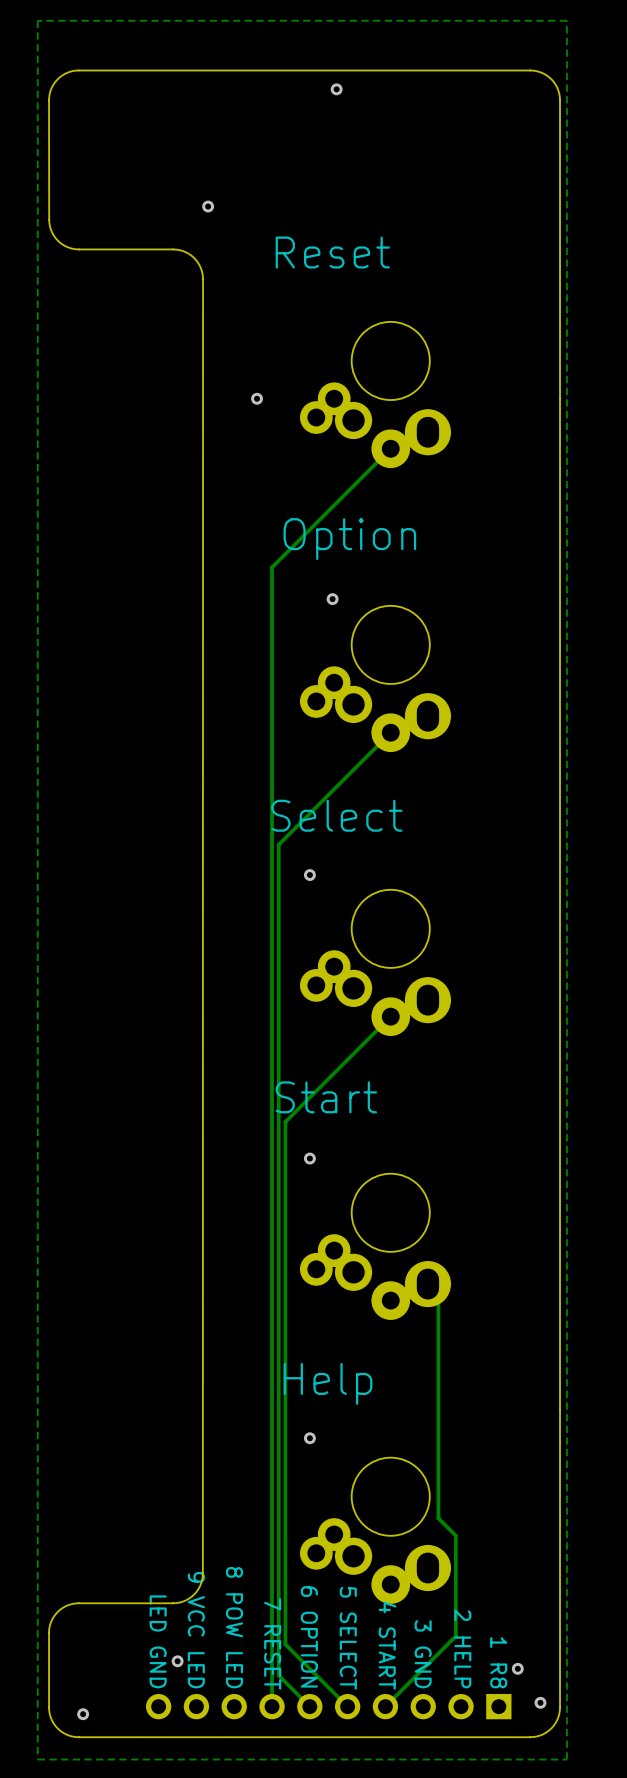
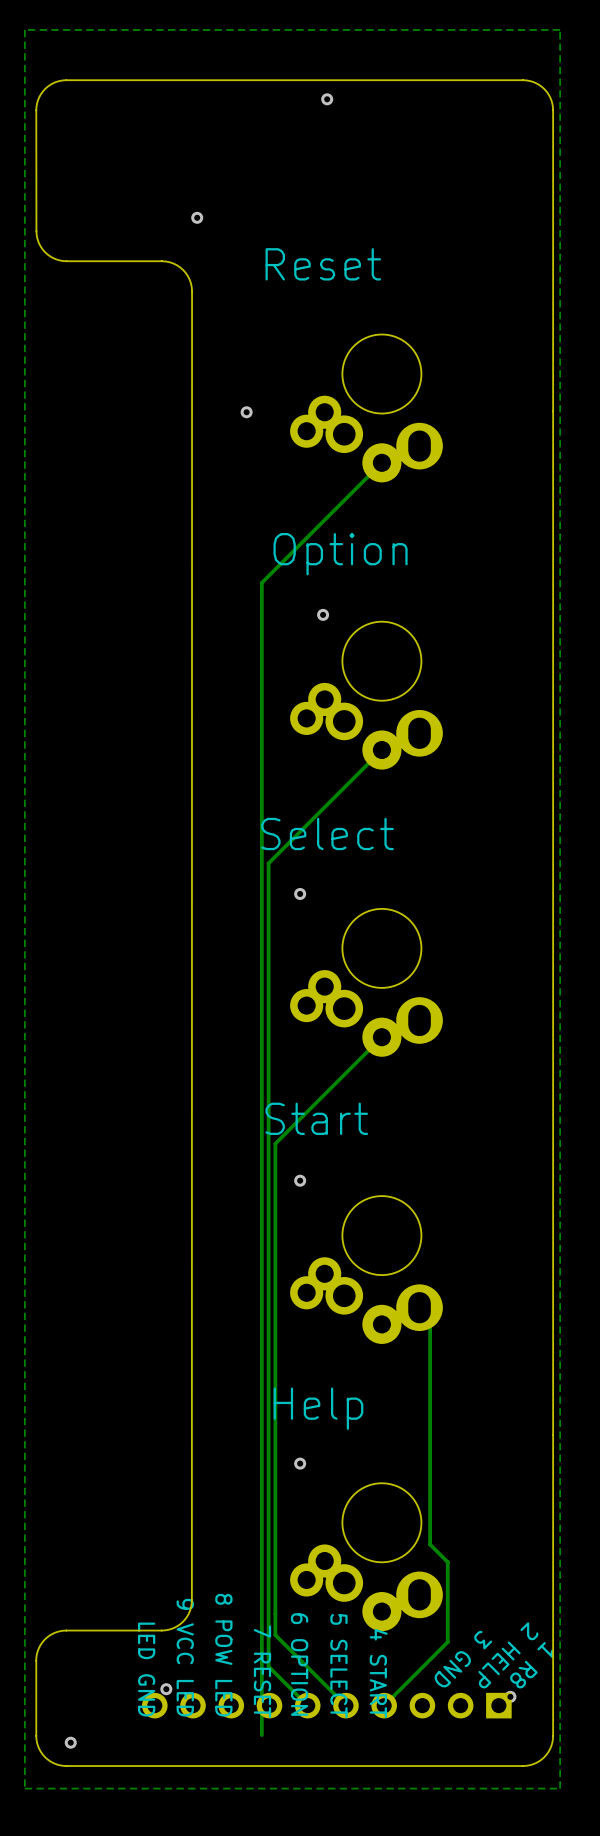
track: (285, 1607) (285, 1644) (347, 1706) -> (275, 1635) (345, 1705)
track: (455, 1614) (455, 1636) (385, 1706) -> (447, 1642) (384, 1705)
track: (278, 1638) (278, 1675) (309, 1706) -> (268, 1666) (307, 1705)
text rotation: 0° (462, 1648) -> 45° clockwise (508, 1655)
text rotation: 0° (423, 1654) -> 45° clockwise (463, 1659)
text rotation: 0° (498, 1662) -> 45° clockwise (531, 1665)
via: (540, 1702) -> none
part position: (328, 1706) -> (326, 1705)

